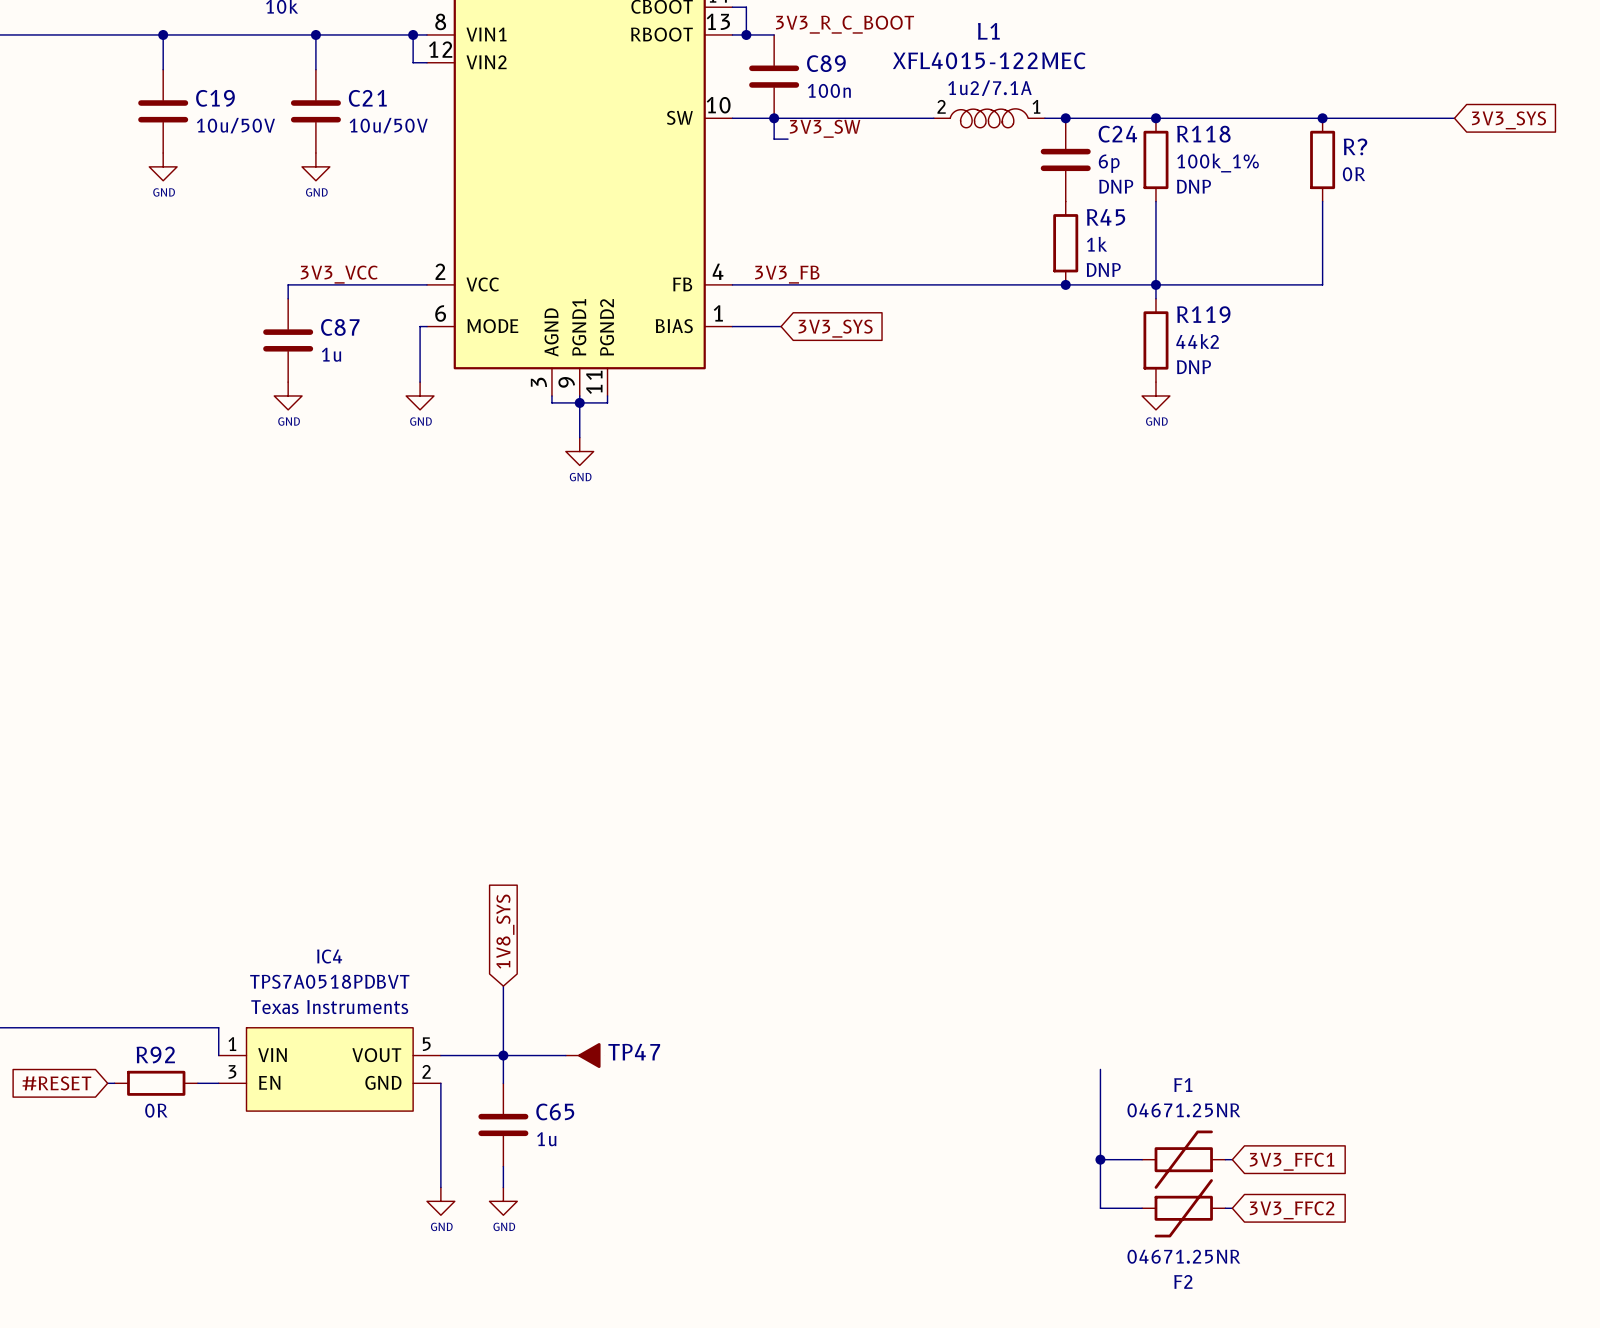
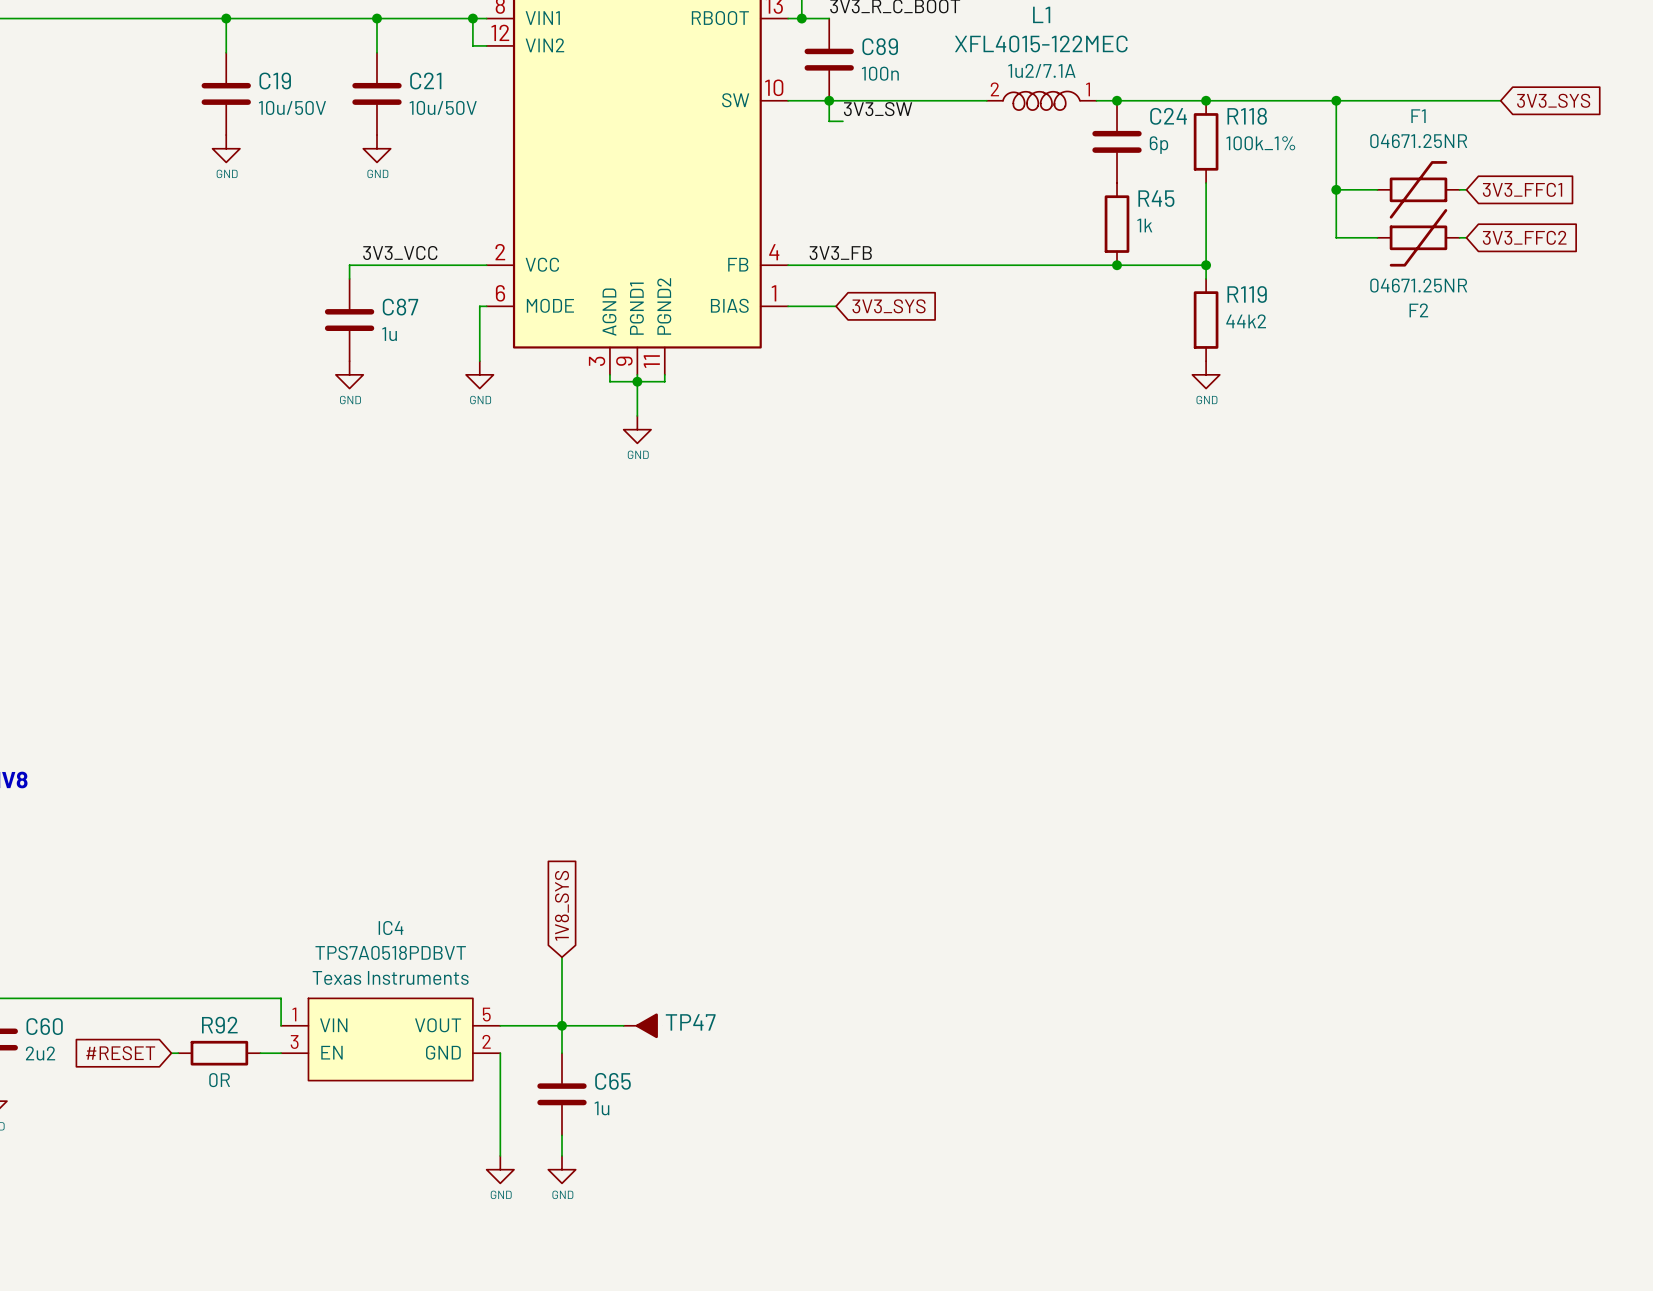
wire: none -> (1336, 100) (1336, 237) (1377, 237)
junction position: (1322, 118) -> (1336, 100)
R?: (1322, 159) -> none
C24 text: DNP (1116, 186) -> none
R118 text: DNP (1193, 186) -> none
wire: (1322, 201) (1322, 284) (1155, 284) -> none
wire: none -> (1336, 189) (1377, 189)
junction: none -> (1336, 189)
wire: none -> (1459, 189) (1466, 189)
global label: none -> 3V3_FFC1 (1522, 189)
wire: none -> (1459, 237) (1466, 237)
global label: none -> 3V3_FFC2 (1524, 237)
R45 text: DNP (1103, 269) -> none
R119 text: DNP (1193, 367) -> none
wire: (1100, 1069) (1100, 1159) -> none
wire: (1100, 1159) (1142, 1159) -> none
wire: (1100, 1159) (1100, 1208) (1142, 1208) -> none
junction: (1100, 1159) -> none
F1 position: (1183, 1159) -> (1418, 189)
wire: (1225, 1159) (1232, 1159) -> none
global label: 3V3_FFC1 (1292, 1161) -> none
F2 position: (1183, 1208) -> (1418, 237)
wire: (1225, 1208) (1232, 1208) -> none
global label: 3V3_FFC2 (1292, 1210) -> none

